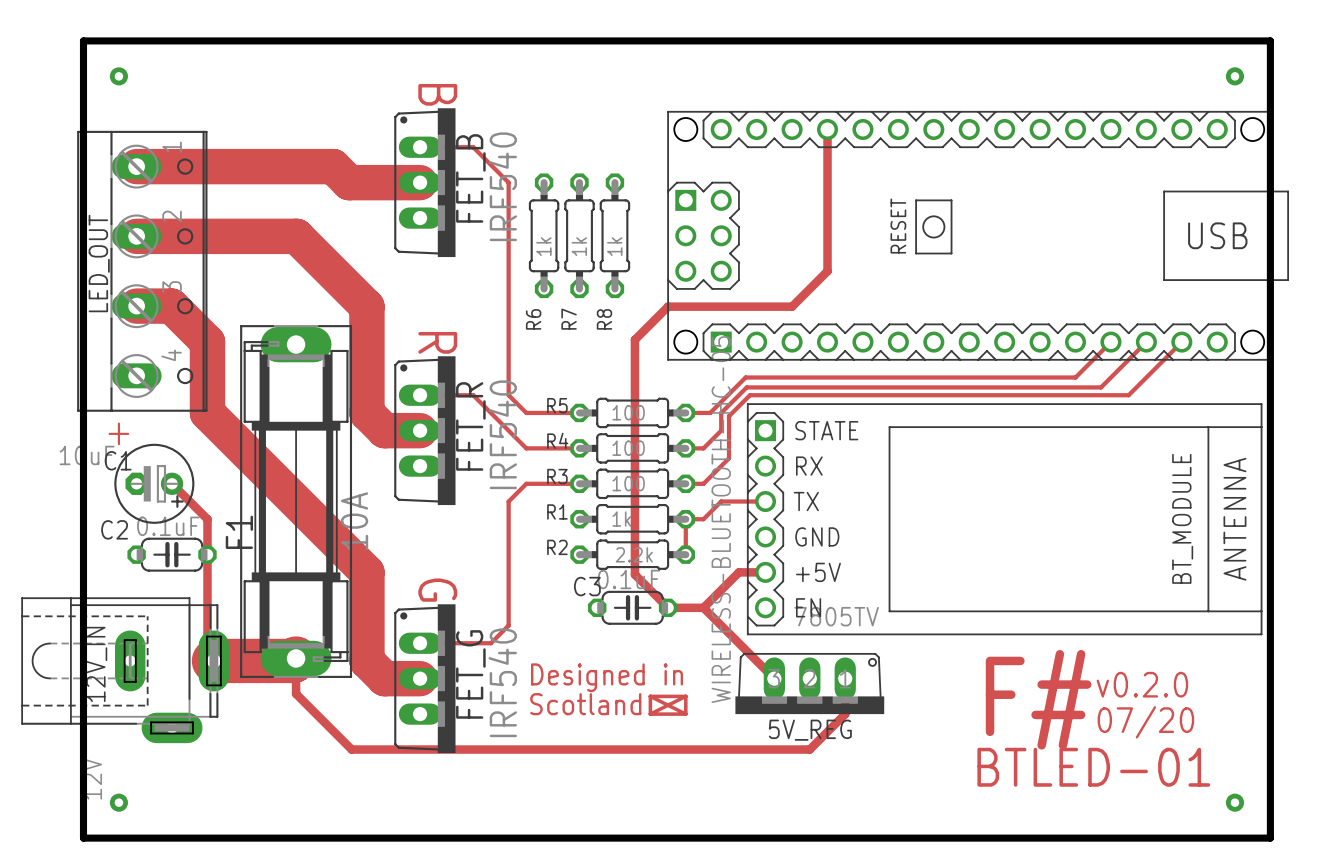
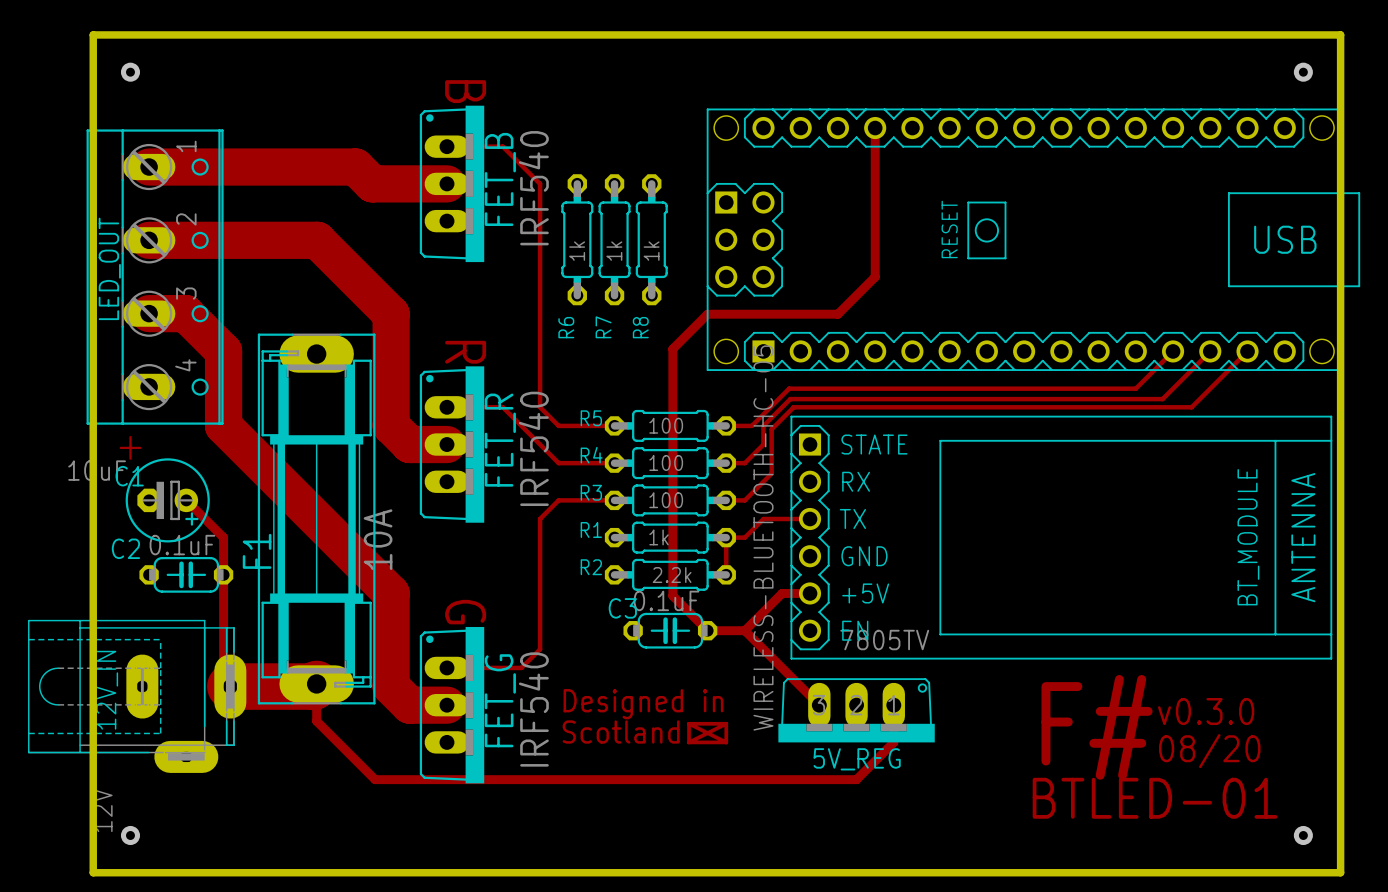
text: v0.2.0 (1142, 684) -> v0.3.0 (1206, 711)
text: 07/20 (1145, 722) -> 08/20 (1209, 751)

